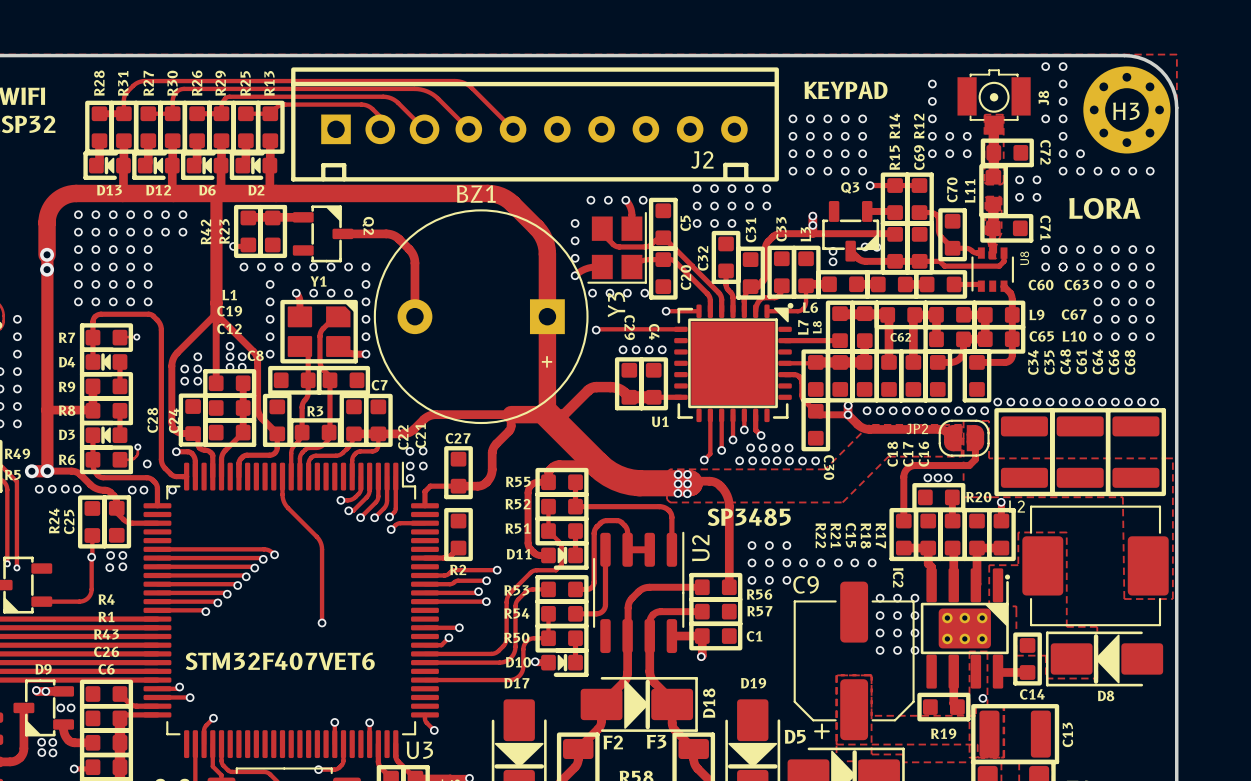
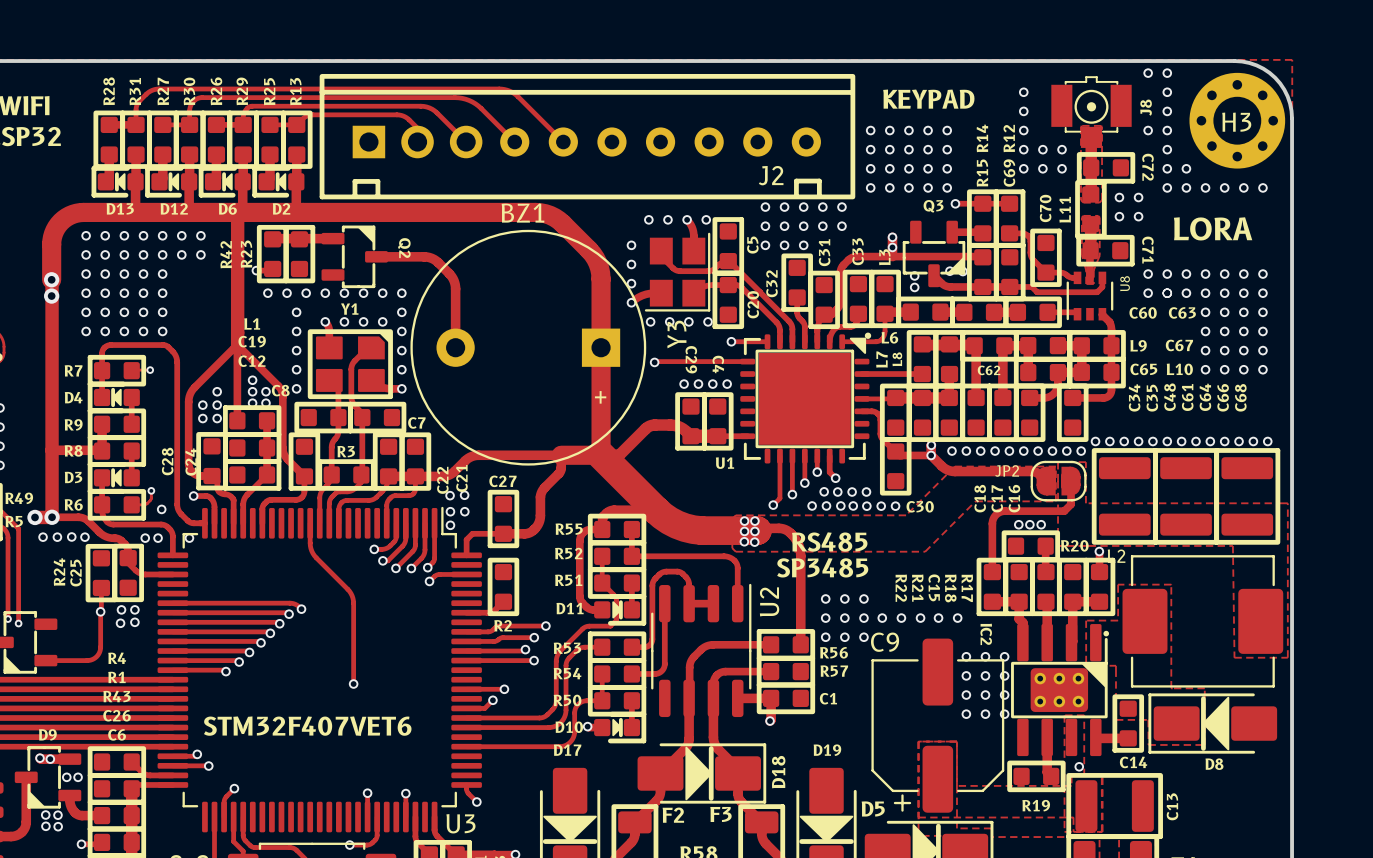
via: (17, 319) -> none
via: (17, 336) -> none
via: (17, 354) -> none
via: (17, 371) -> none
via: (17, 389) -> none
via: (17, 406) -> none
via: (17, 423) -> none
C30 name rotation: 0° (828, 467) -> 90° counterclockwise (920, 506)
text: none -> RS485 (829, 542)

